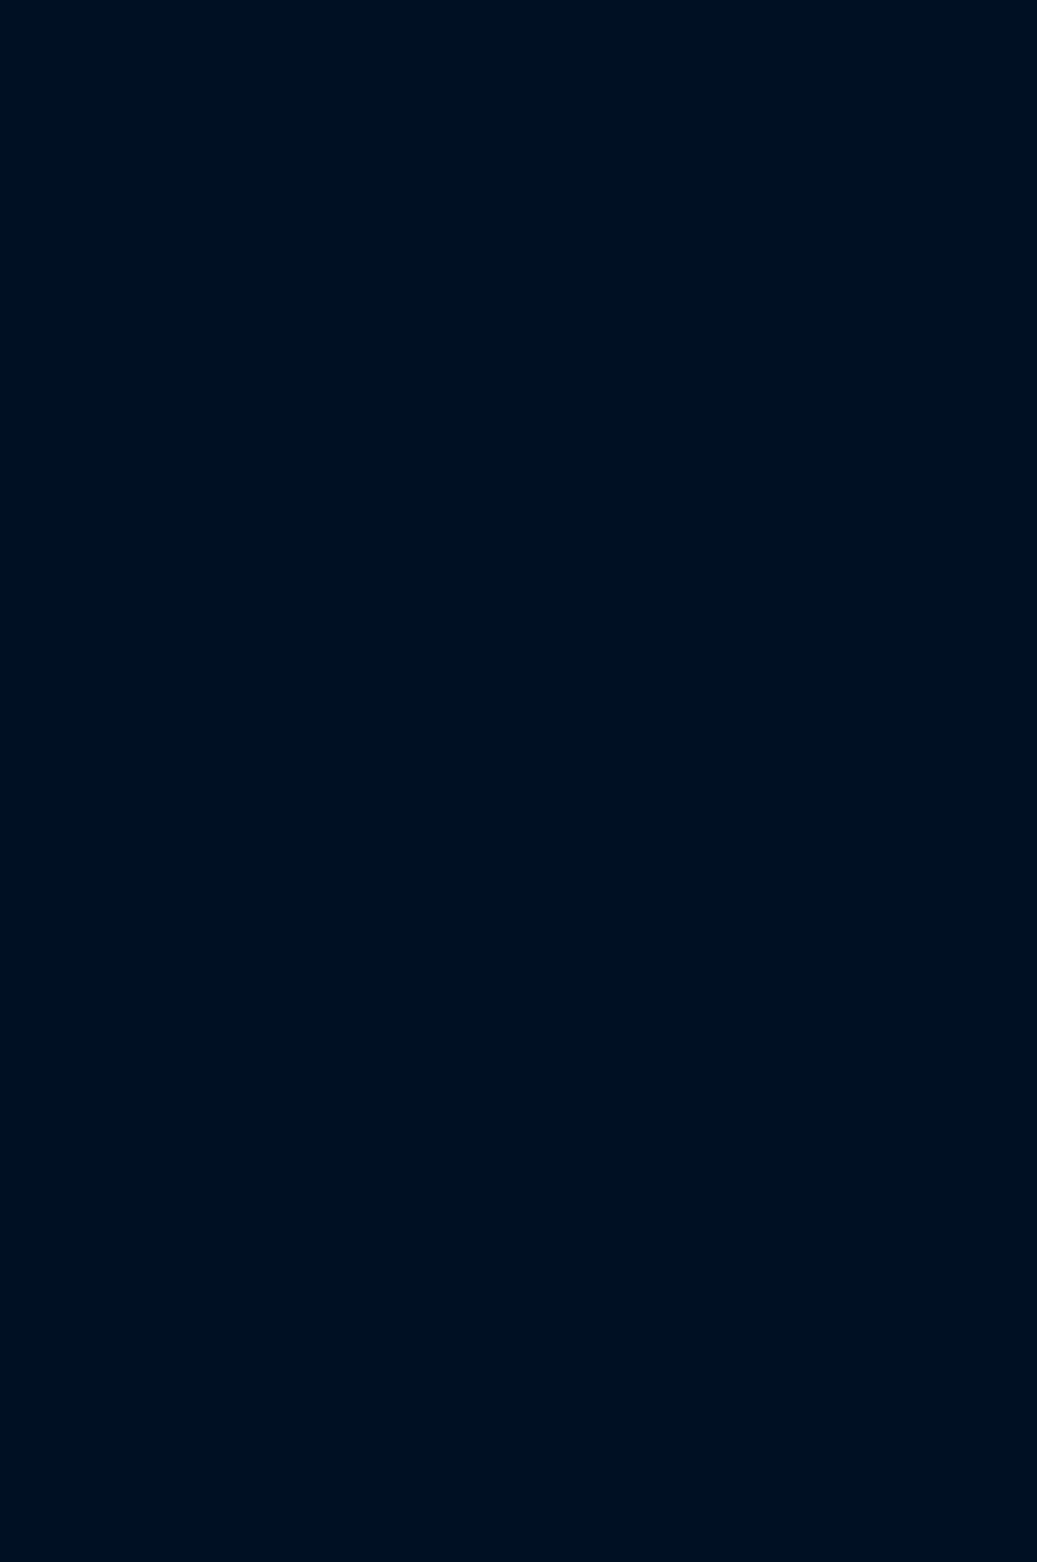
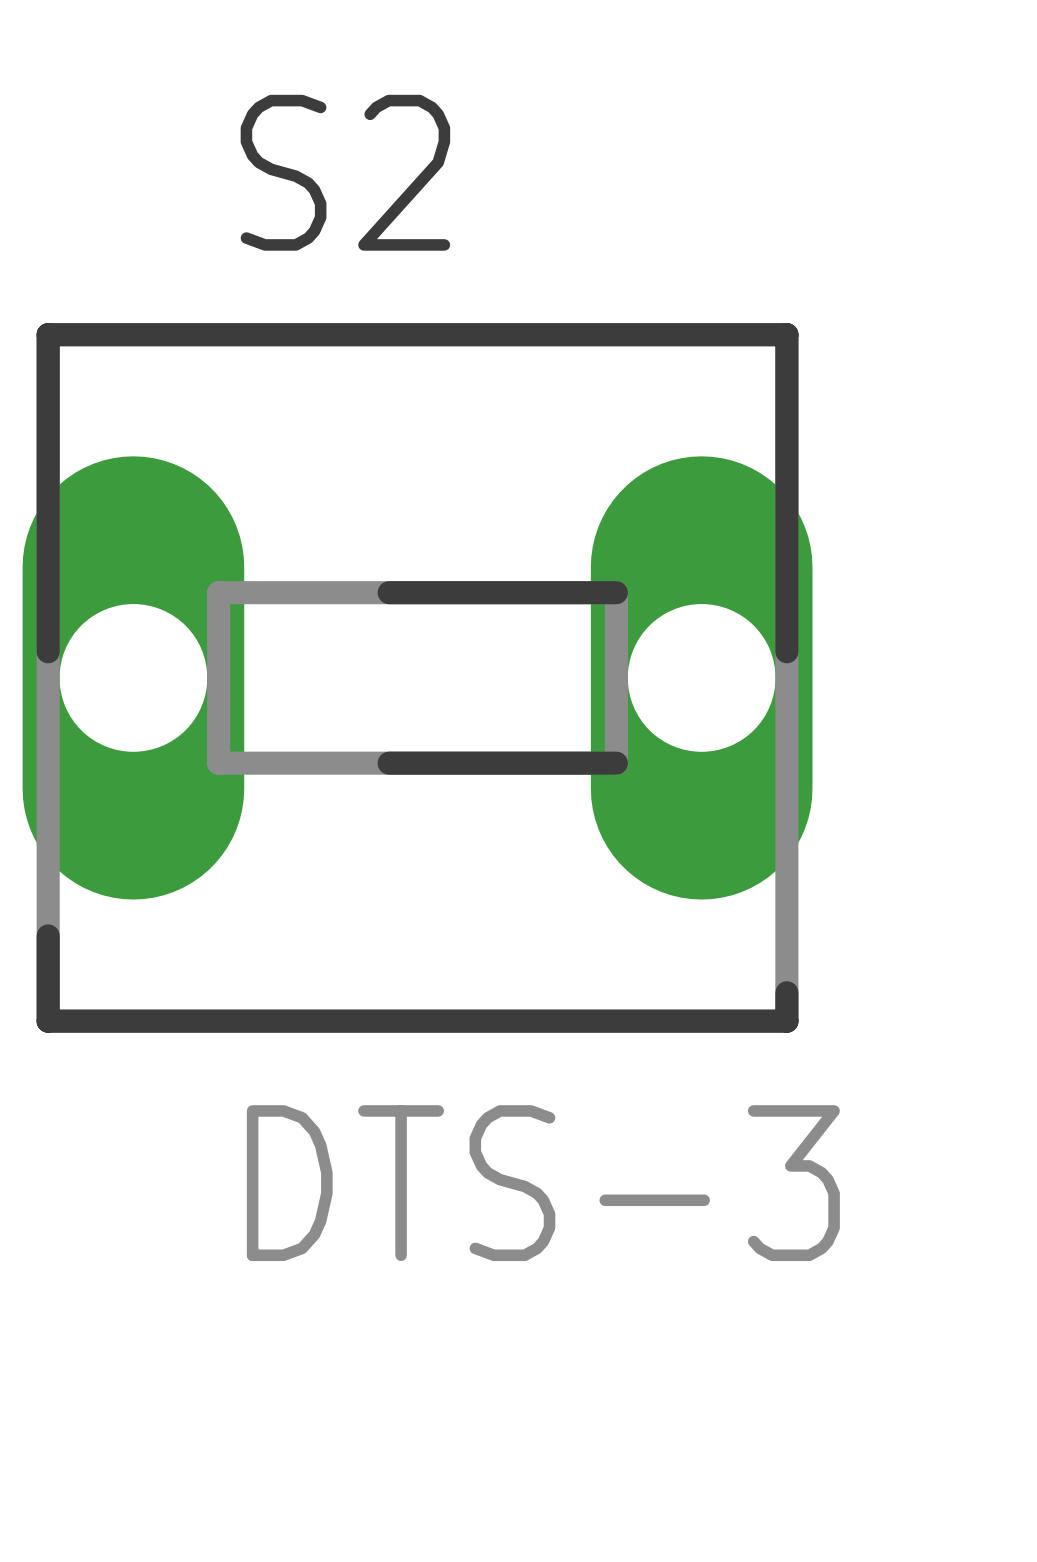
S2: none -> DTS-3 (417, 677)

